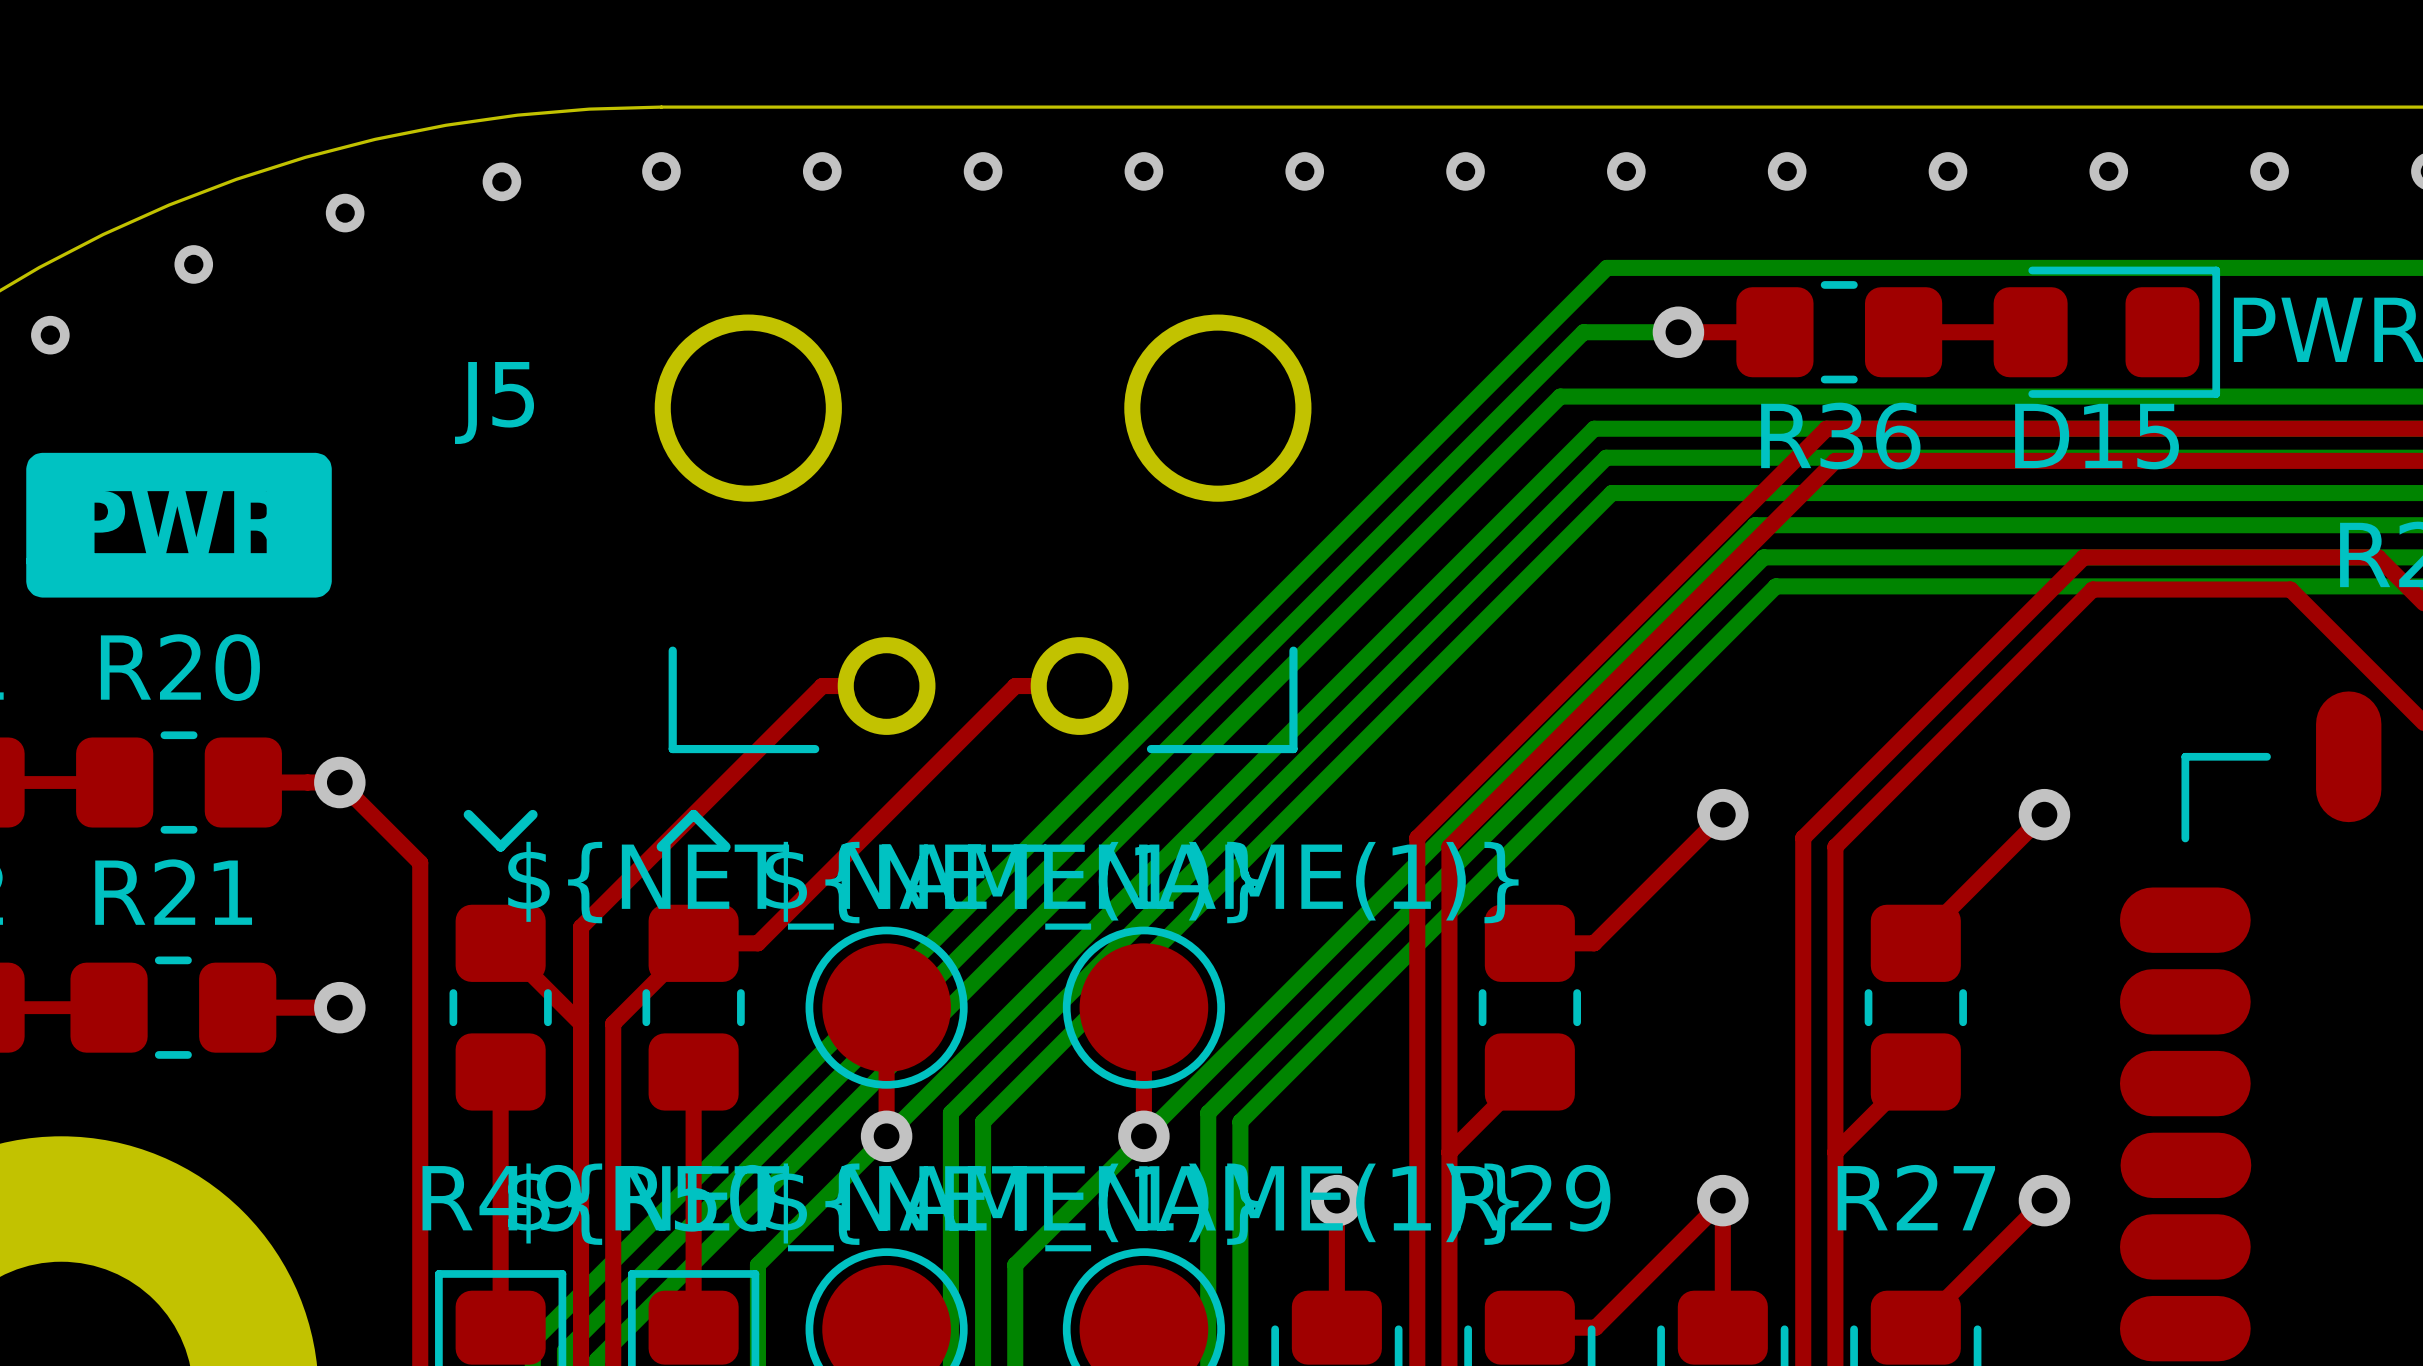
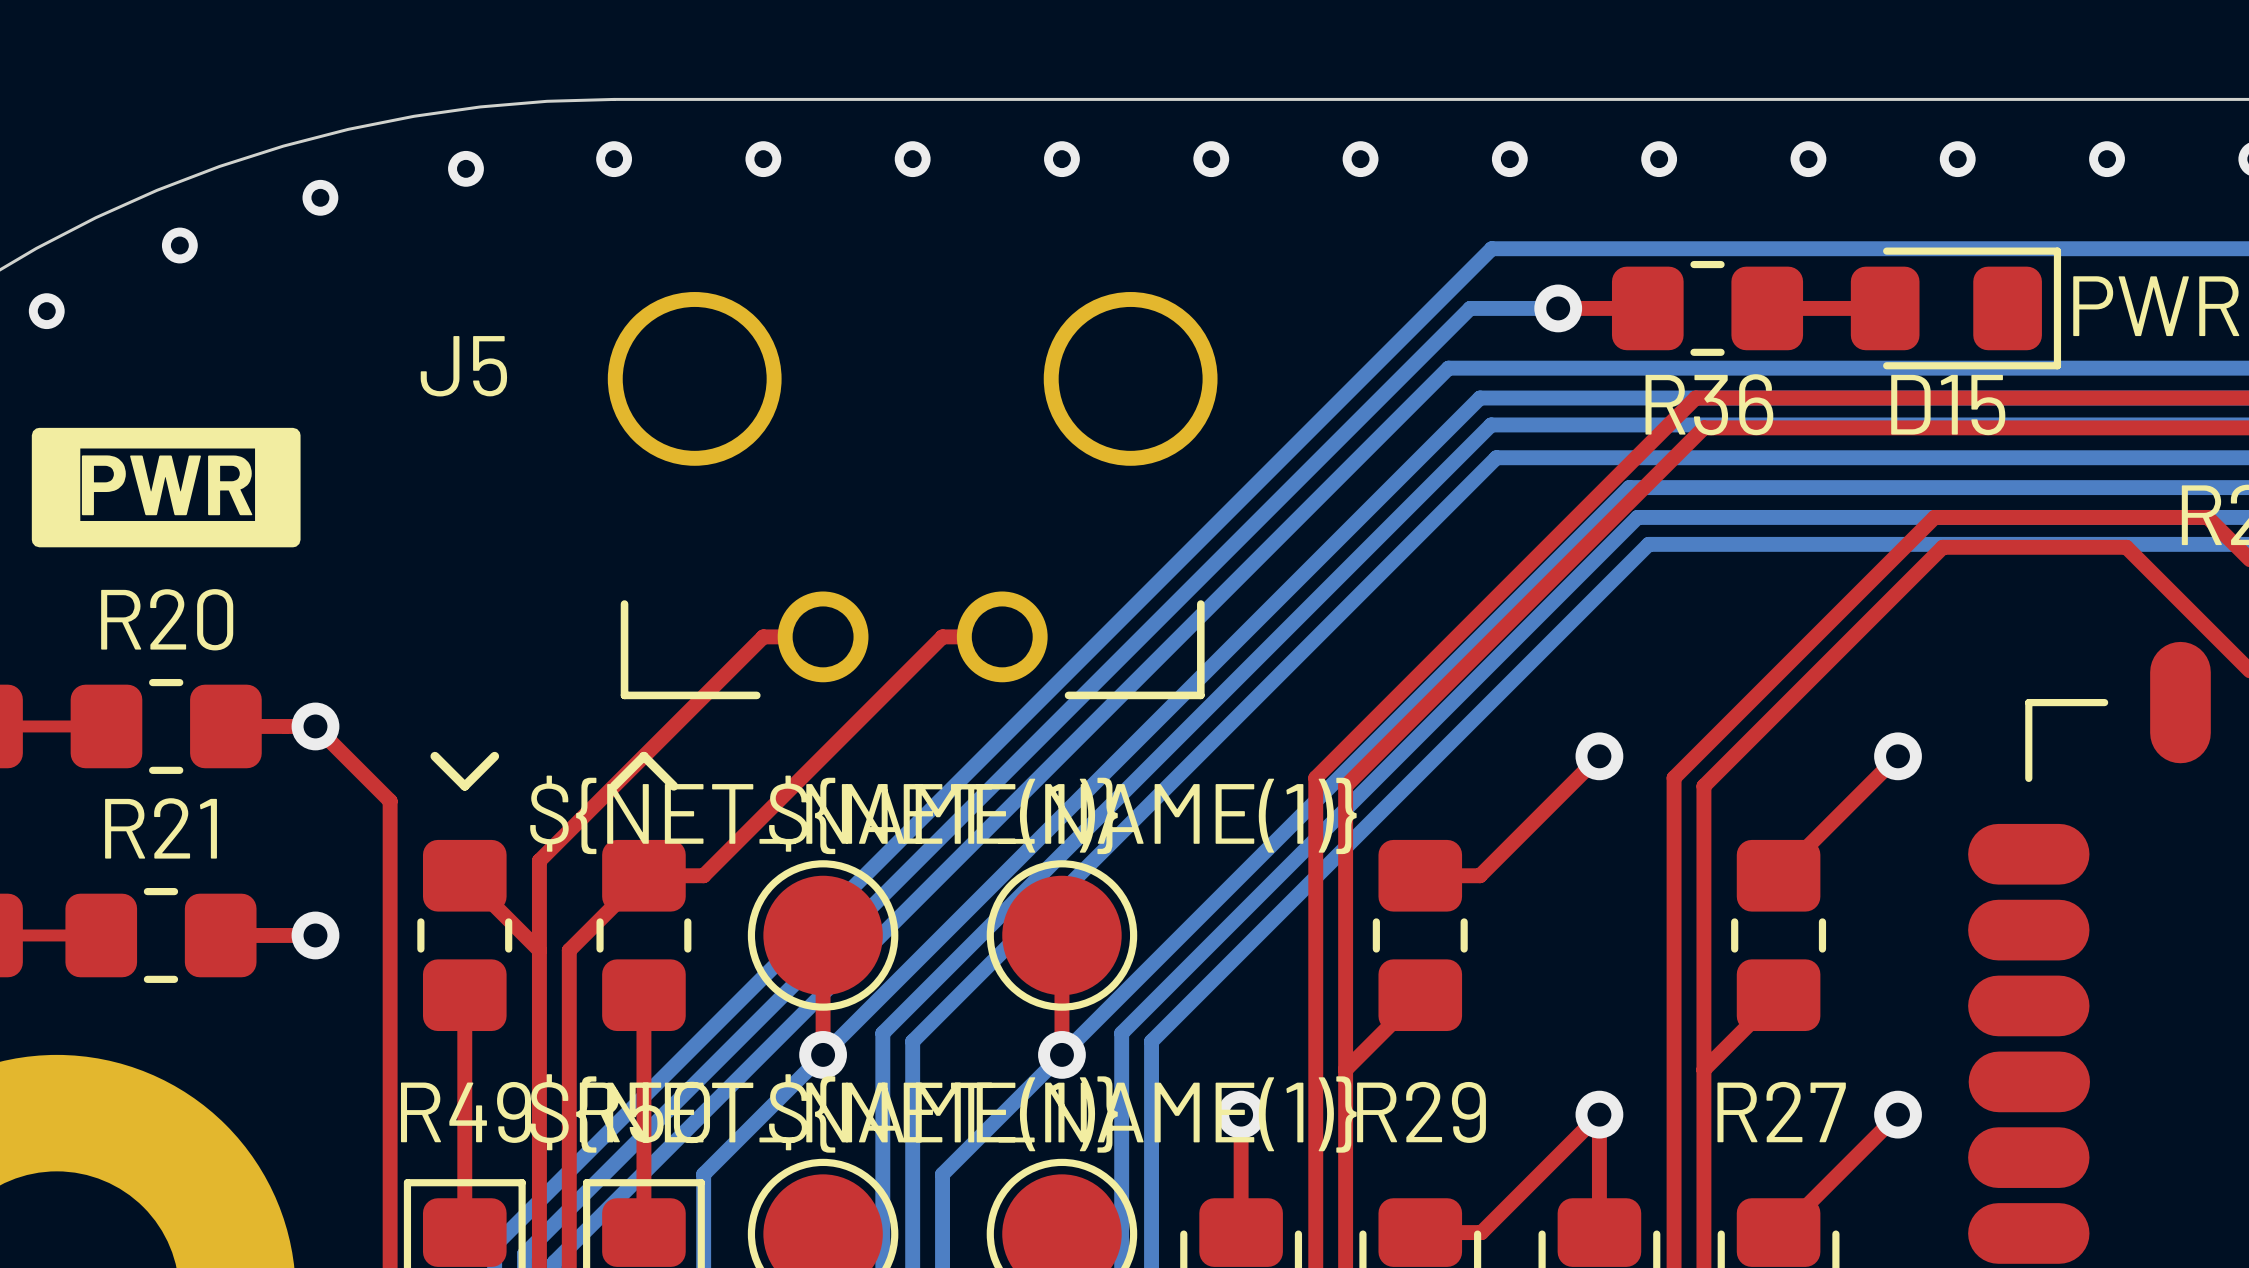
drawing shape: [26, 452, 332, 598] -> [31, 427, 301, 548]

